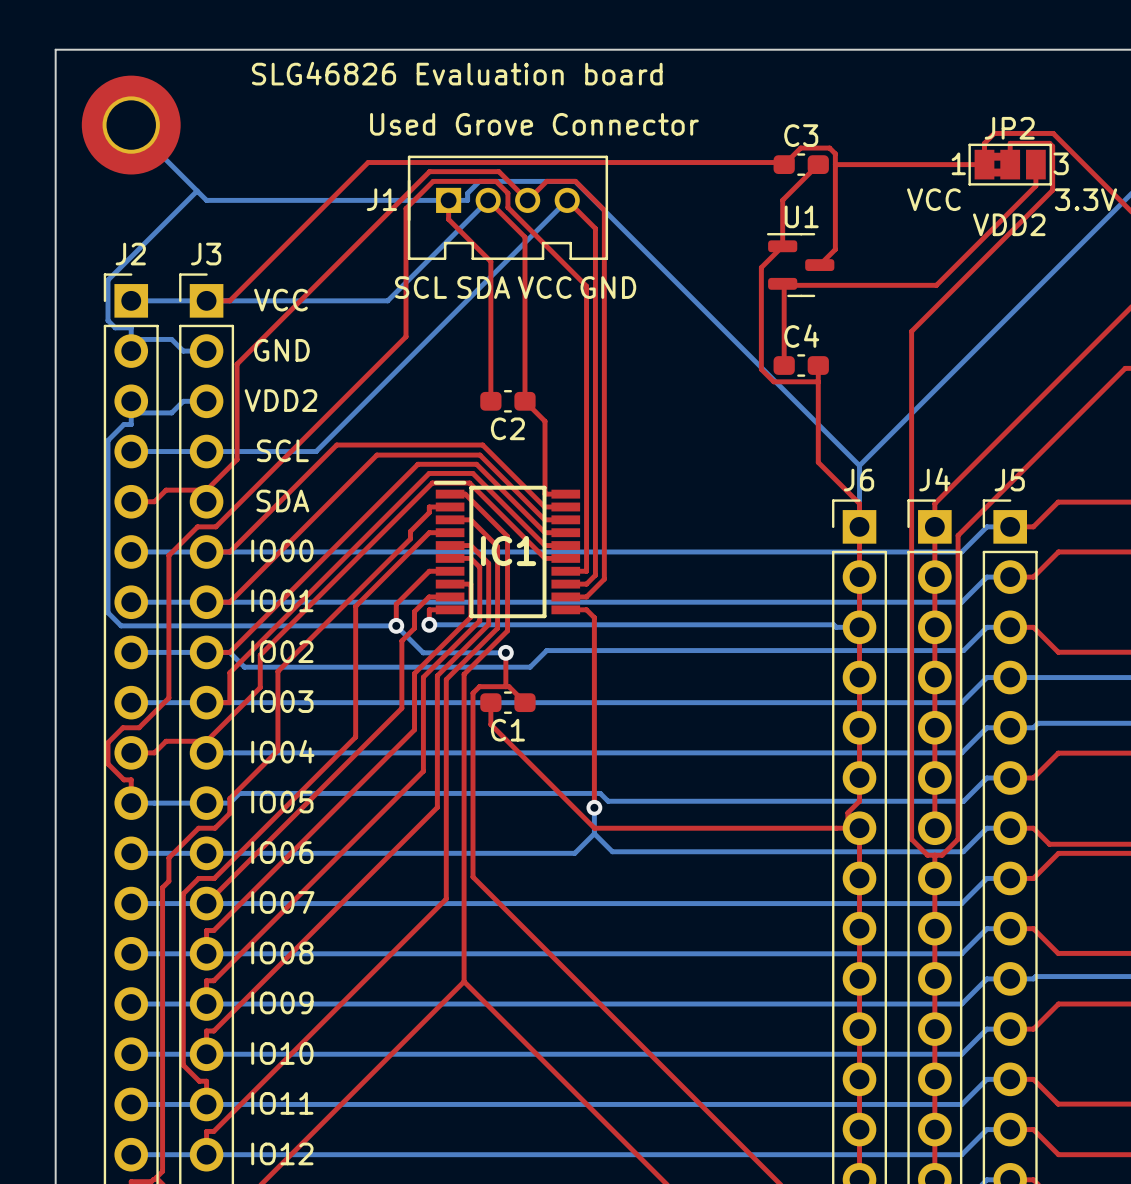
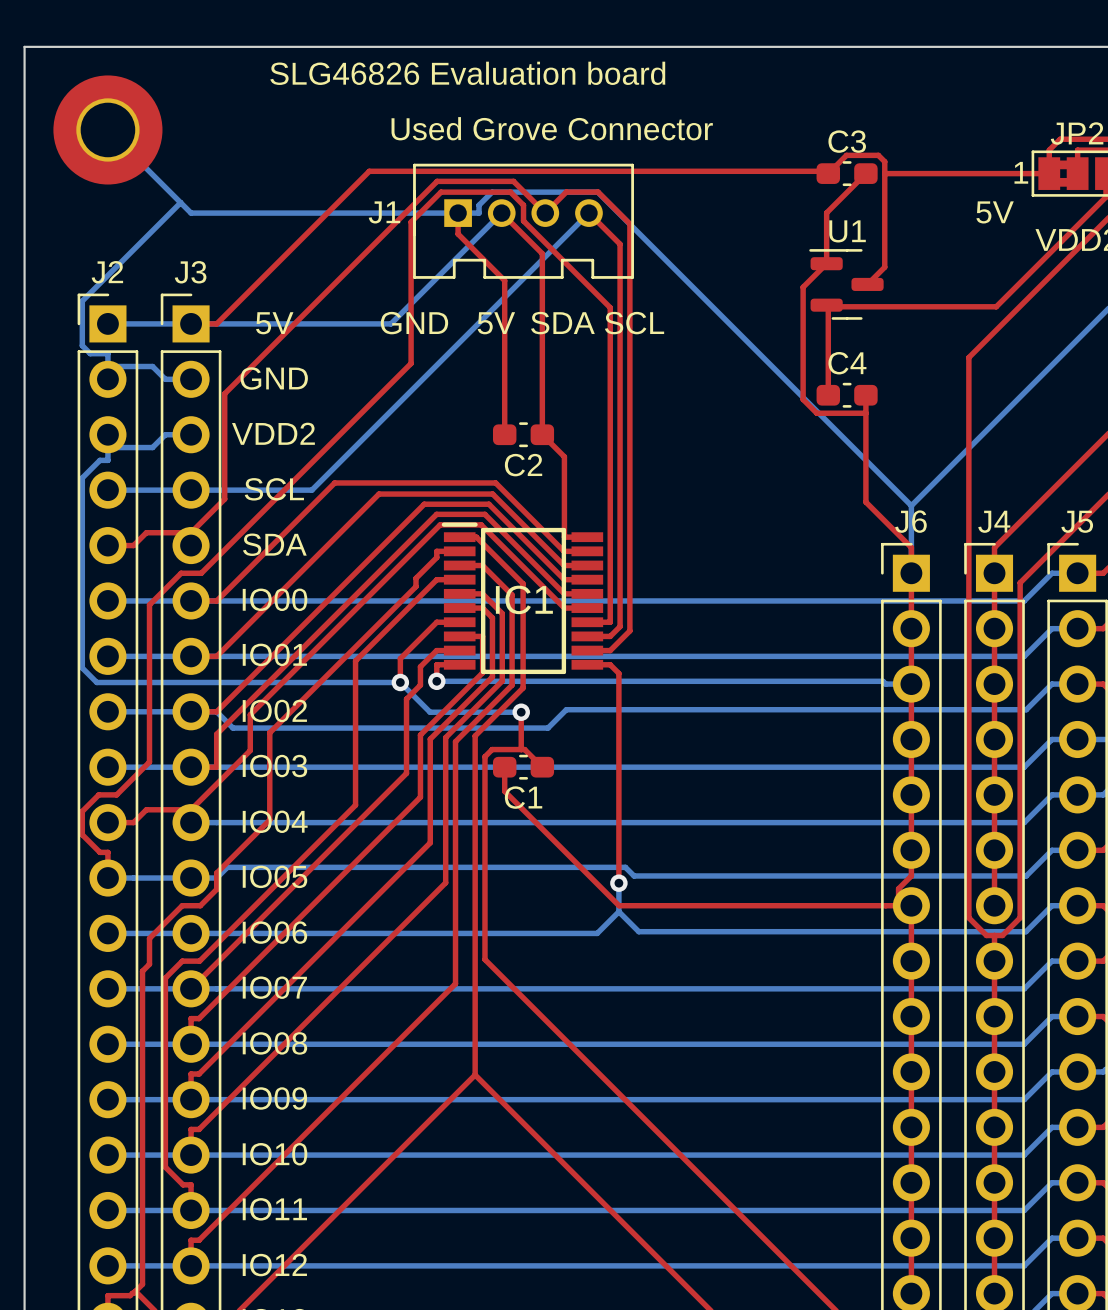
text: VCC (933, 199) -> 5V (995, 212)
text: SCL (420, 287) -> GND (414, 323)
text: SDA (483, 287) -> 5V (496, 323)
text: VCC (544, 287) -> SDA (562, 323)
text: GND (608, 287) -> SCL (634, 323)
text: VCC (280, 300) -> 5V (274, 323)

